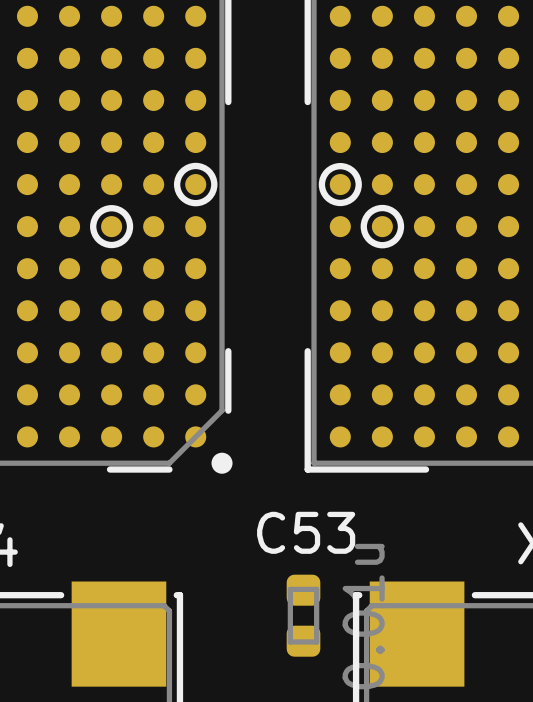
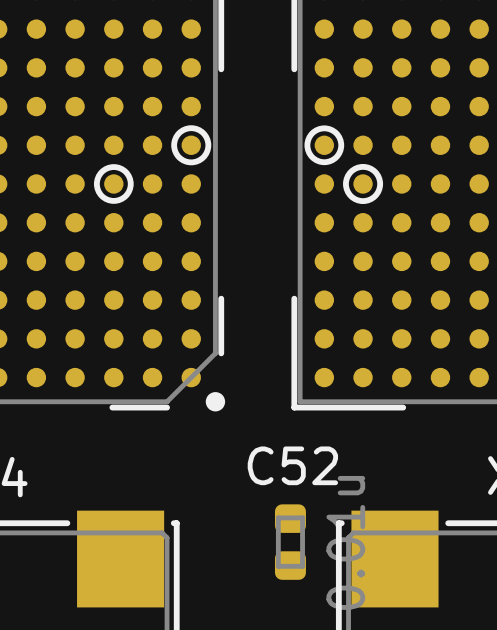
C53 name: C53 (306, 532) -> C52 (292, 465)

